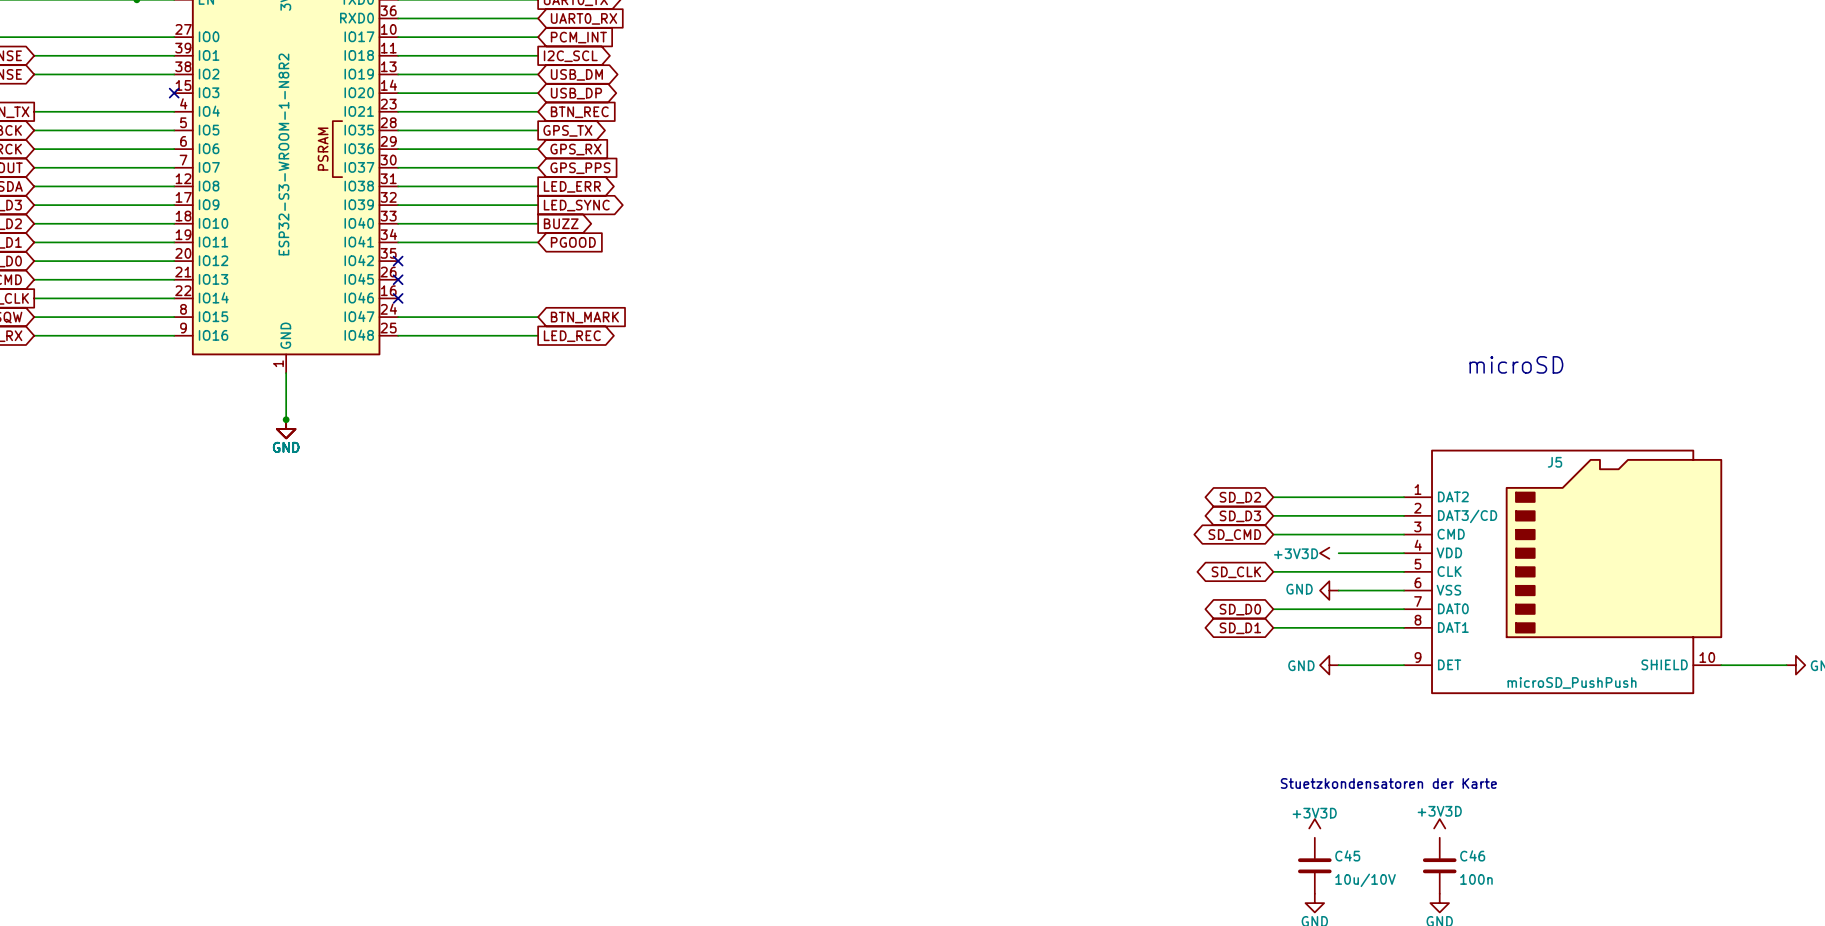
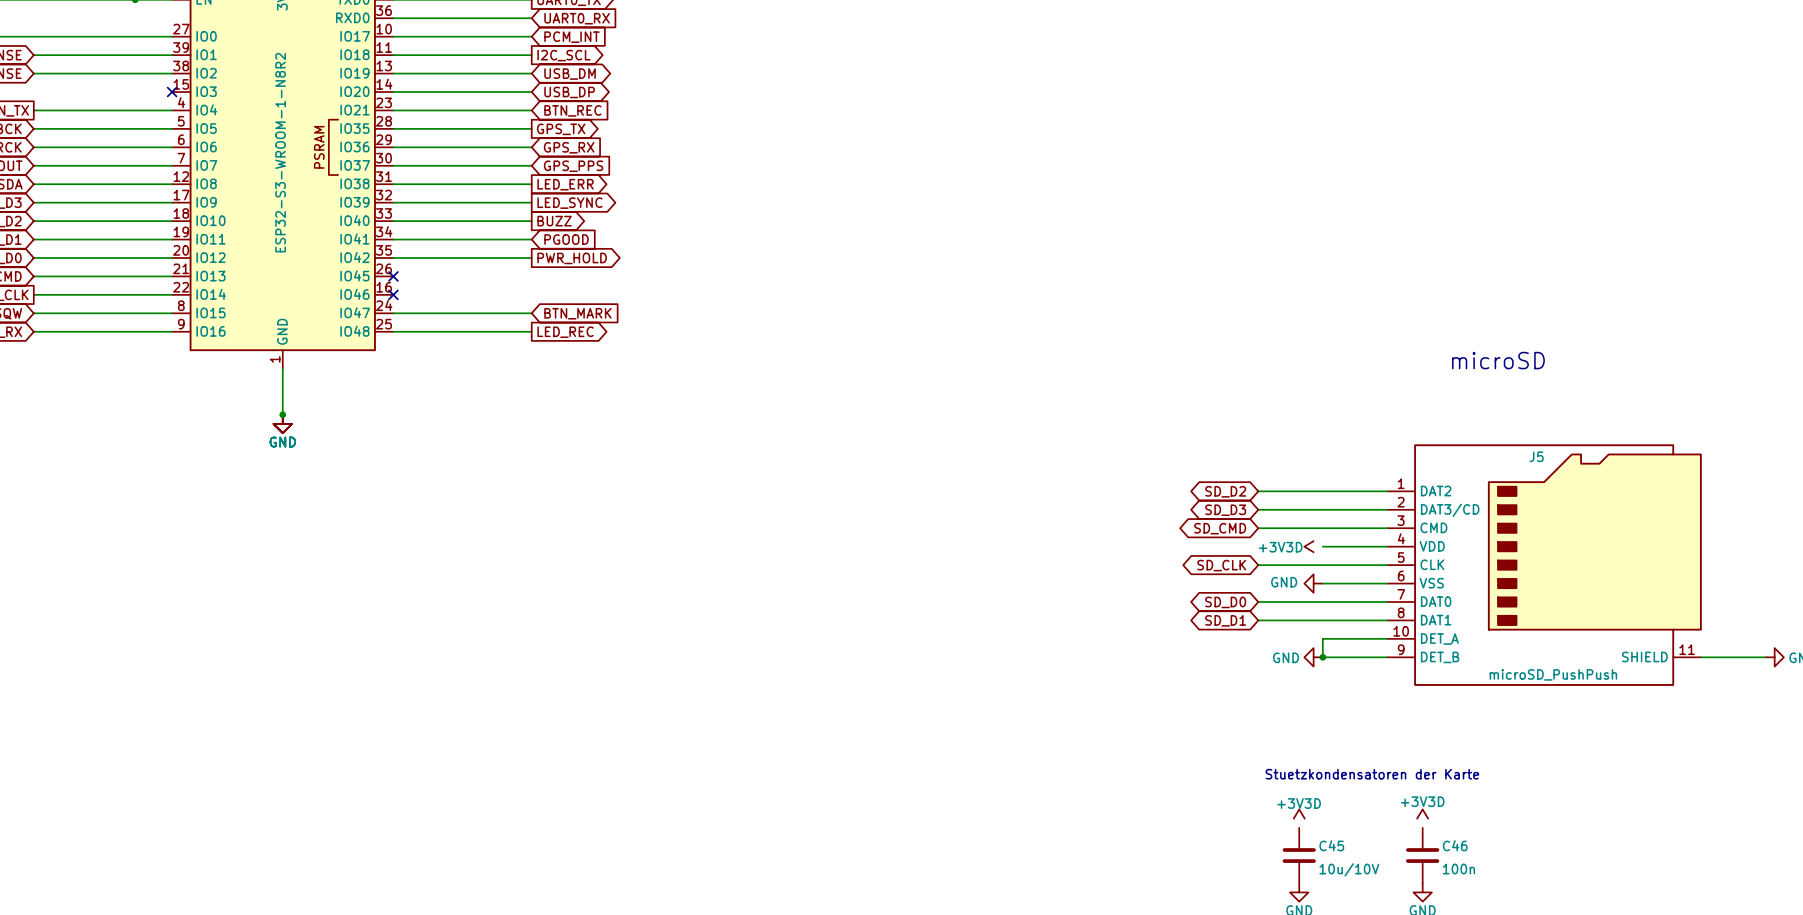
wire: none -> (393, 257) (531, 257)
no-connect mark: (398, 261) -> none
global label: none -> PWR_HOLD (572, 258)
J5 symbol: [1404, 449, 1723, 695] -> [1387, 444, 1702, 686]
wire: none -> (1387, 638) (1322, 638) (1322, 657)
junction: none -> (1322, 657)

